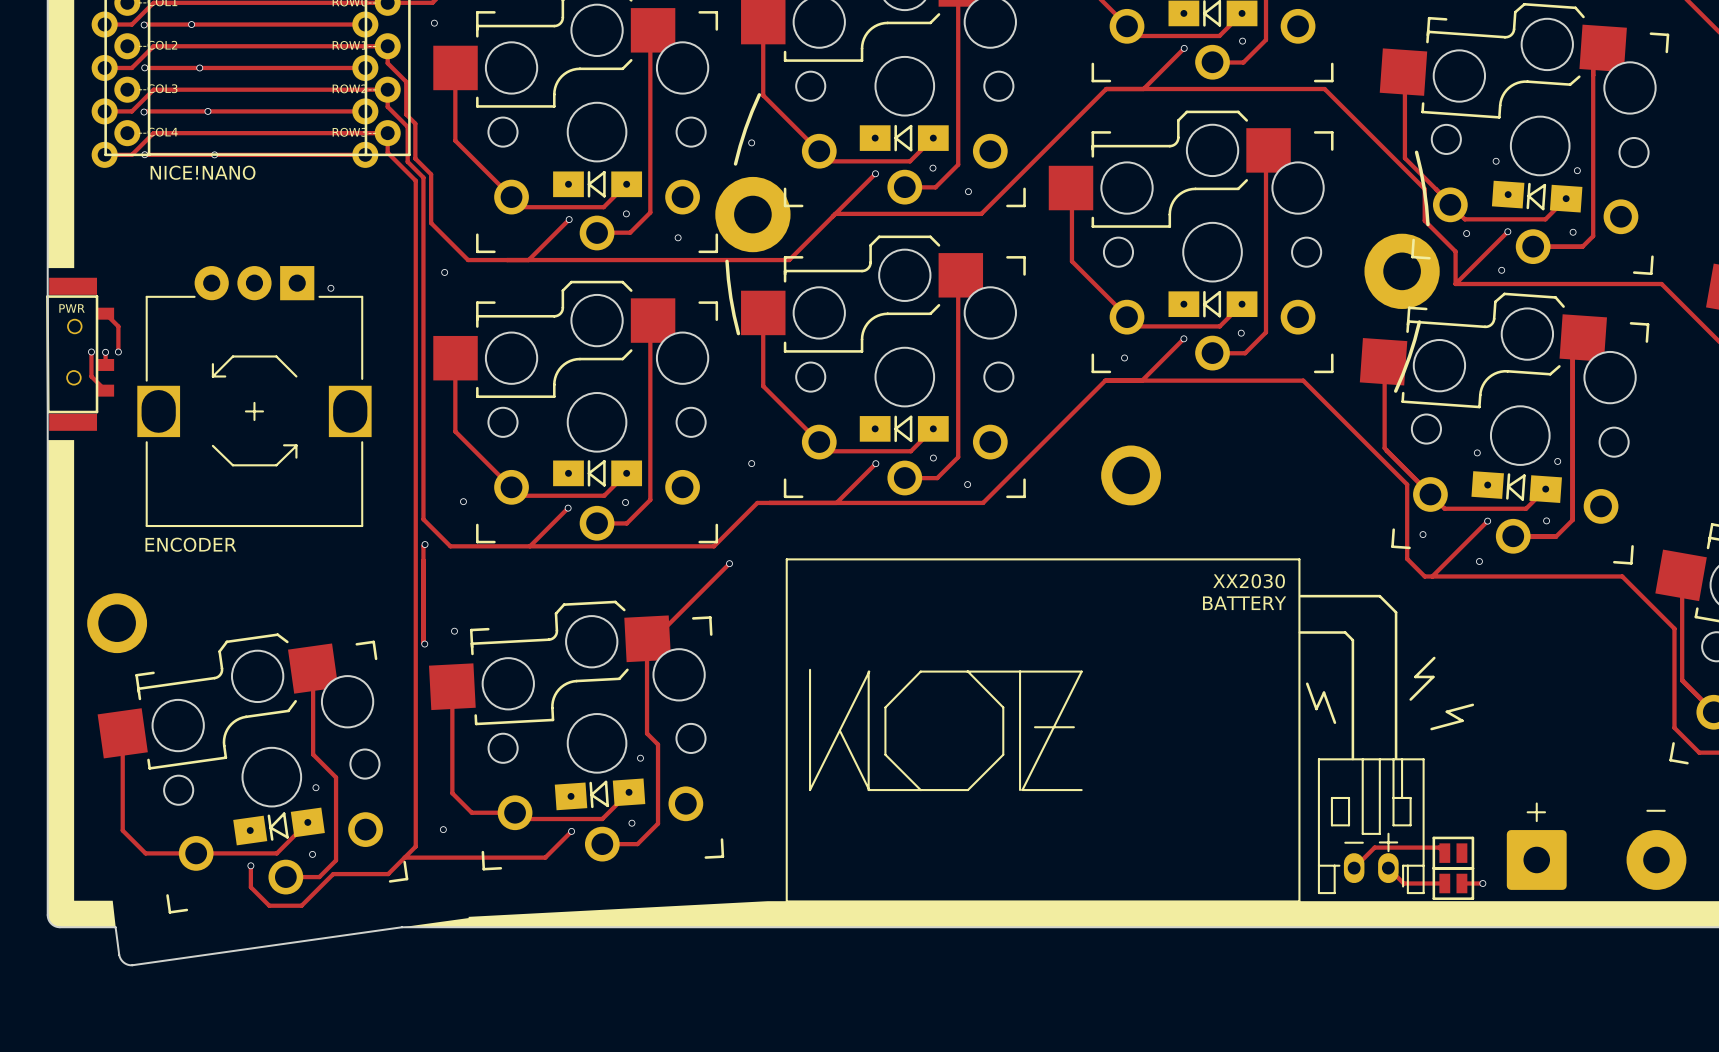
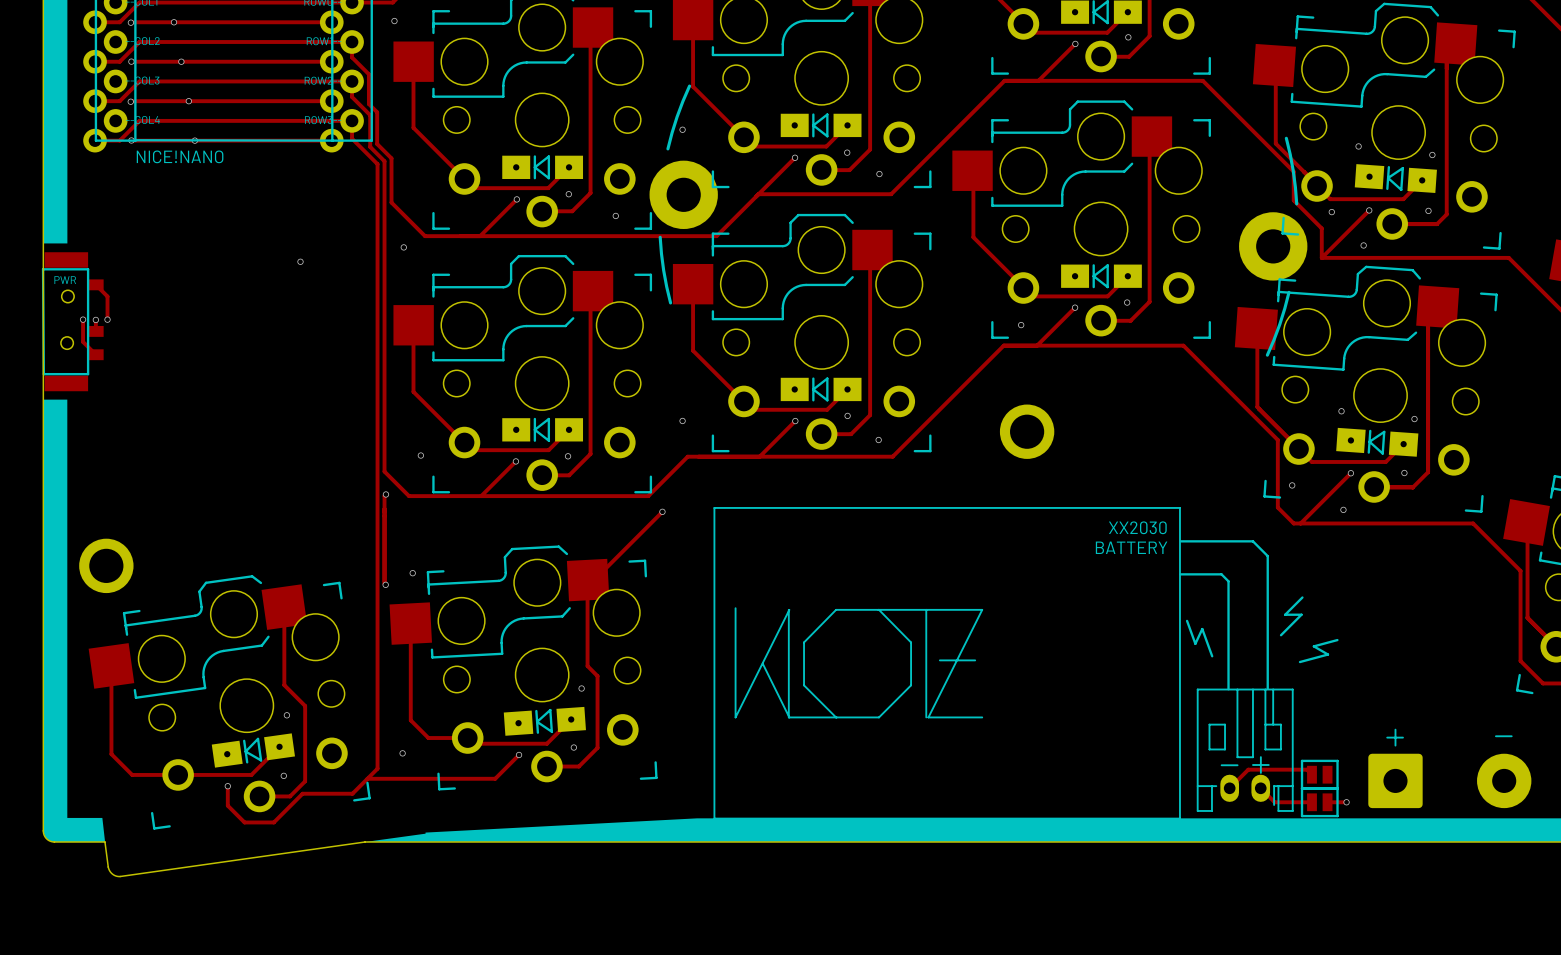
part: (254, 396) -> none
text: ENCODER (190, 544) -> none

